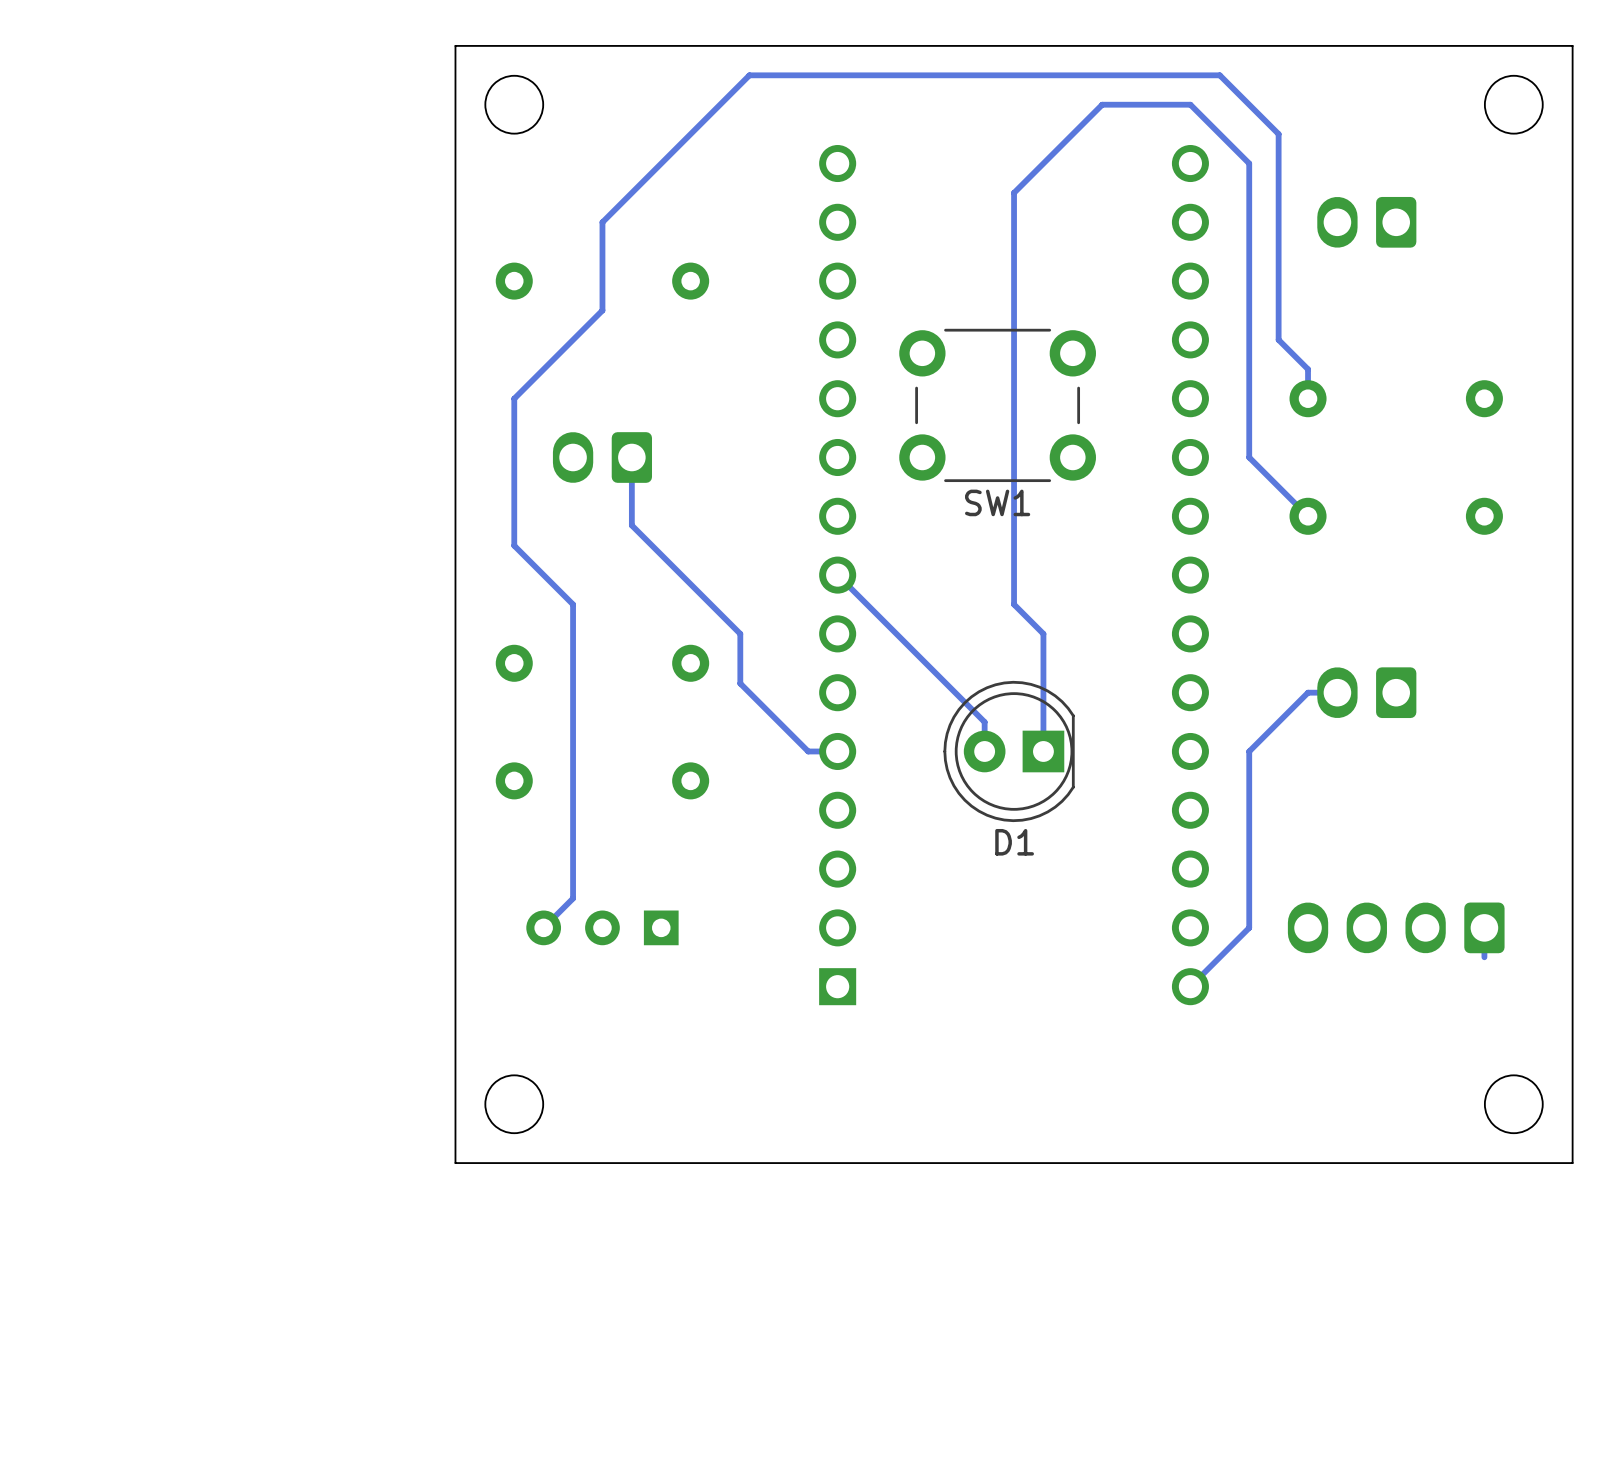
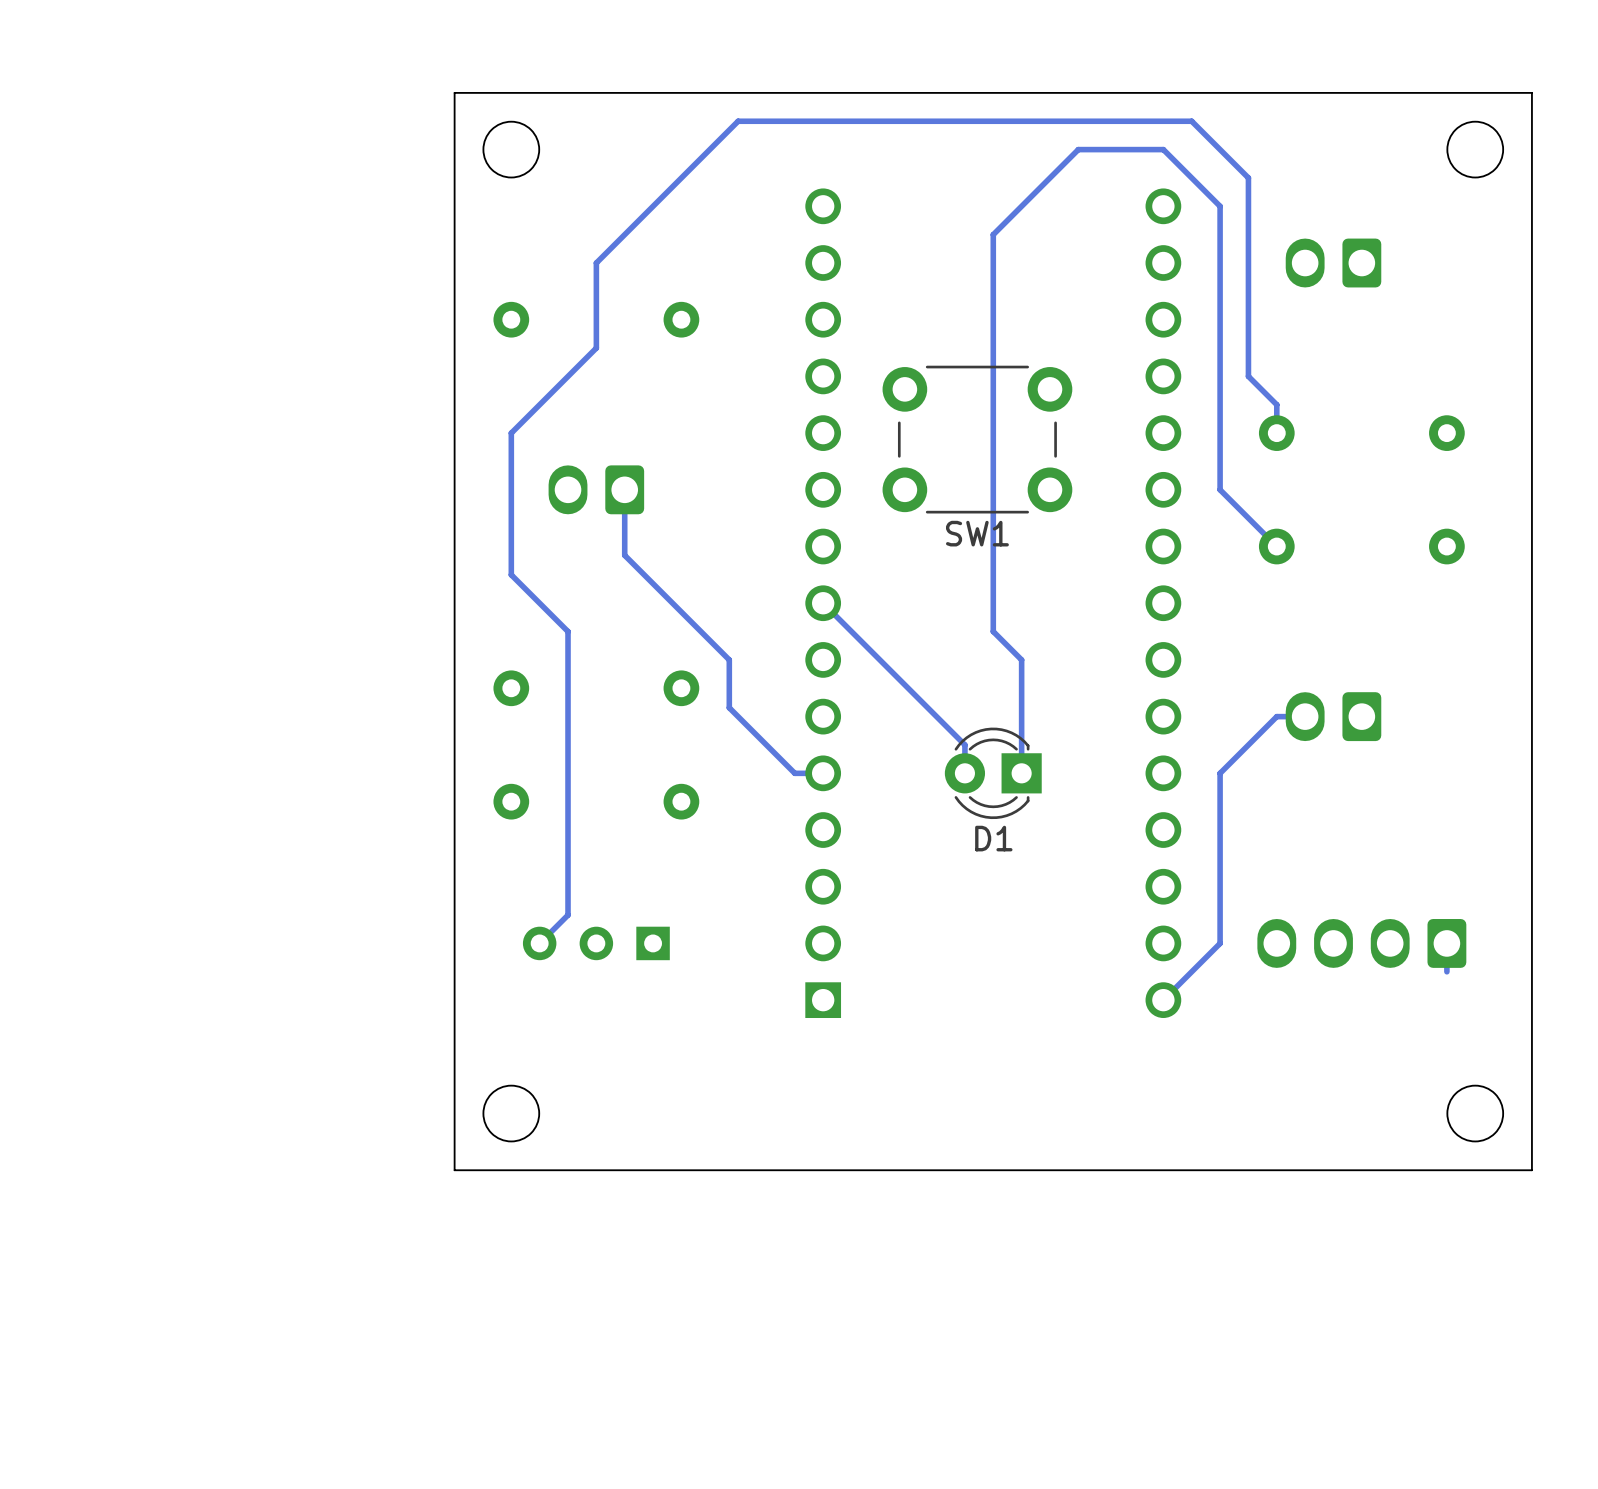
D1 footprint: [943, 680, 1075, 823] -> [944, 727, 1042, 820]

